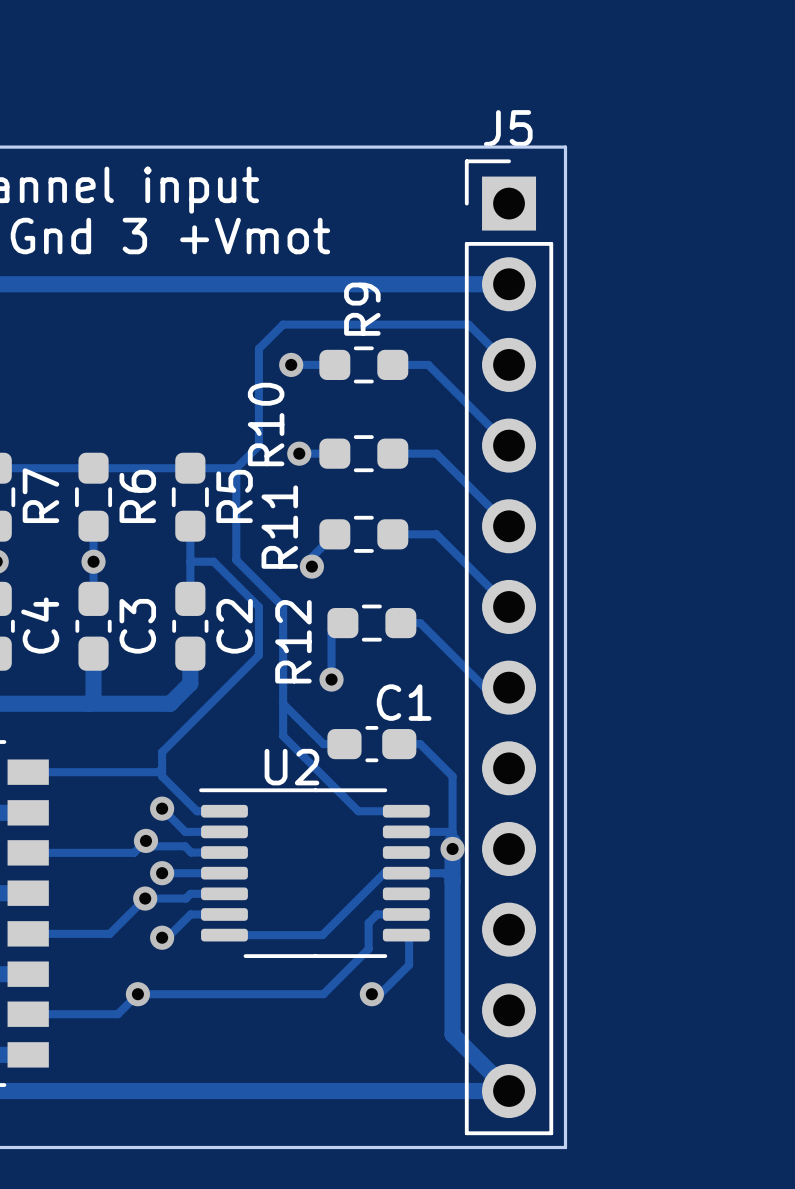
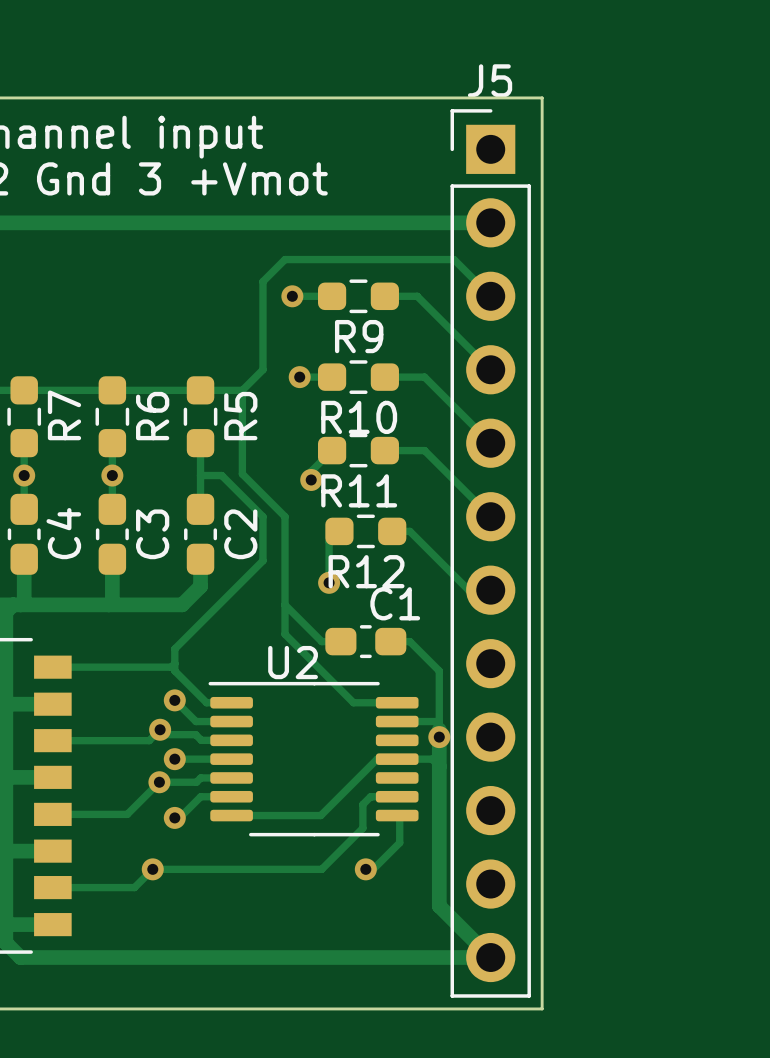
R9 name rotation: 0° (362, 309) -> 90° clockwise (359, 336)
R9 name position: R9 (362, 309) -> R9 (359, 336)
R10 name rotation: 0° (266, 424) -> 90° clockwise (359, 417)
R10 name position: R10 (266, 424) -> R10 (359, 417)
R11 name rotation: 0° (279, 527) -> 90° clockwise (359, 490)
R12 name rotation: 0° (293, 641) -> 90° clockwise (366, 571)

